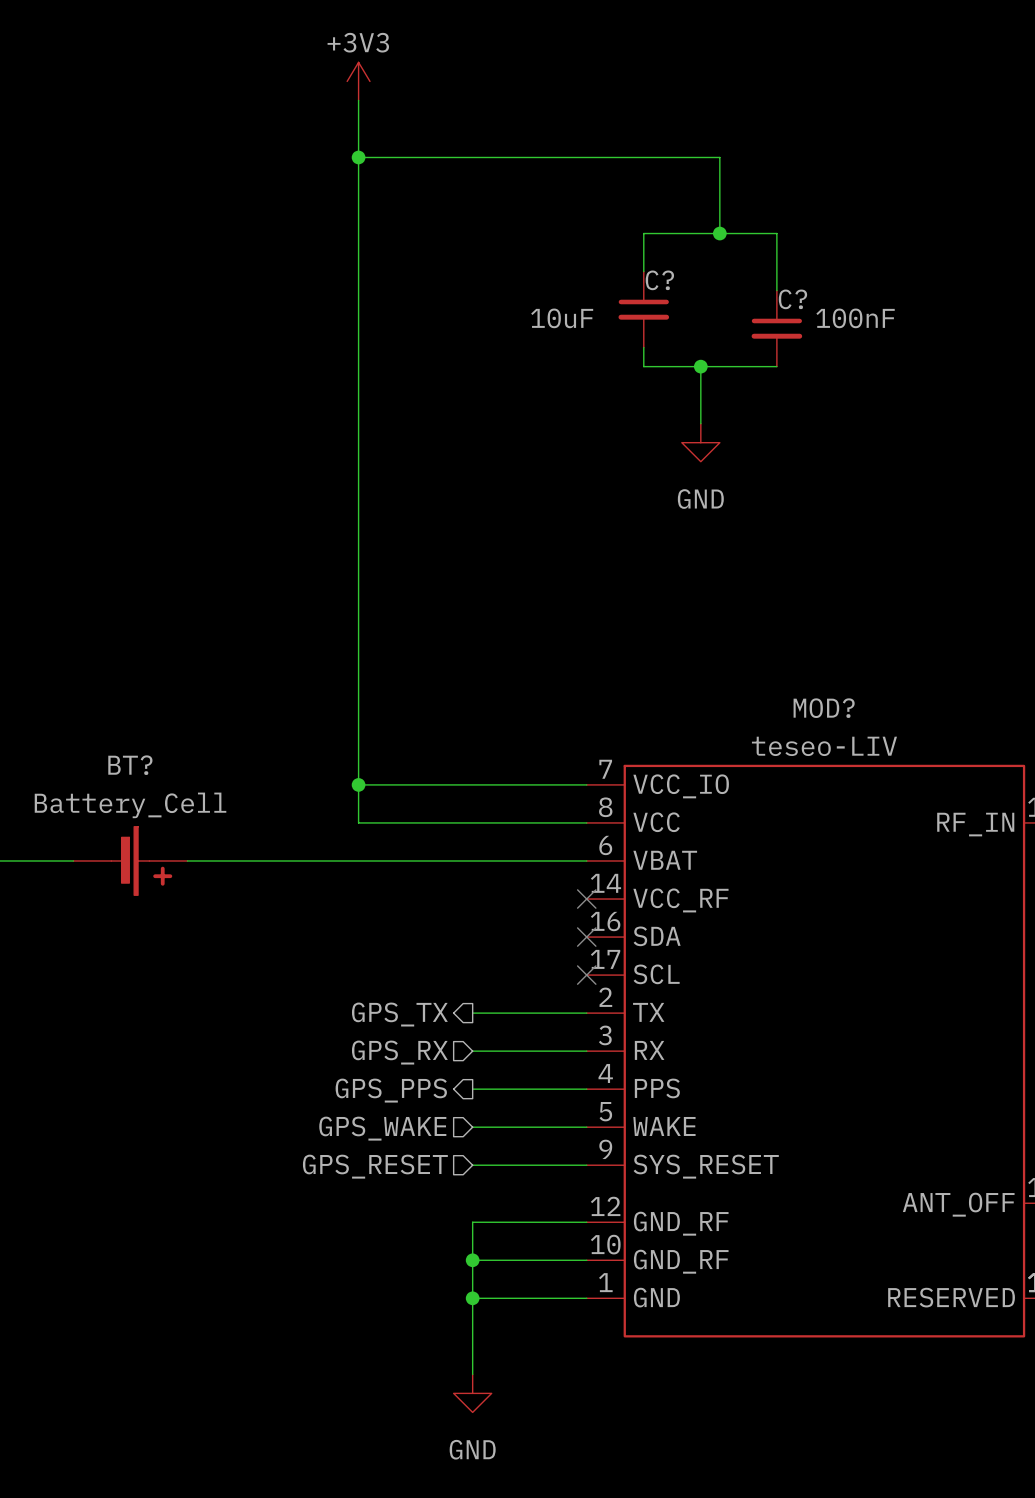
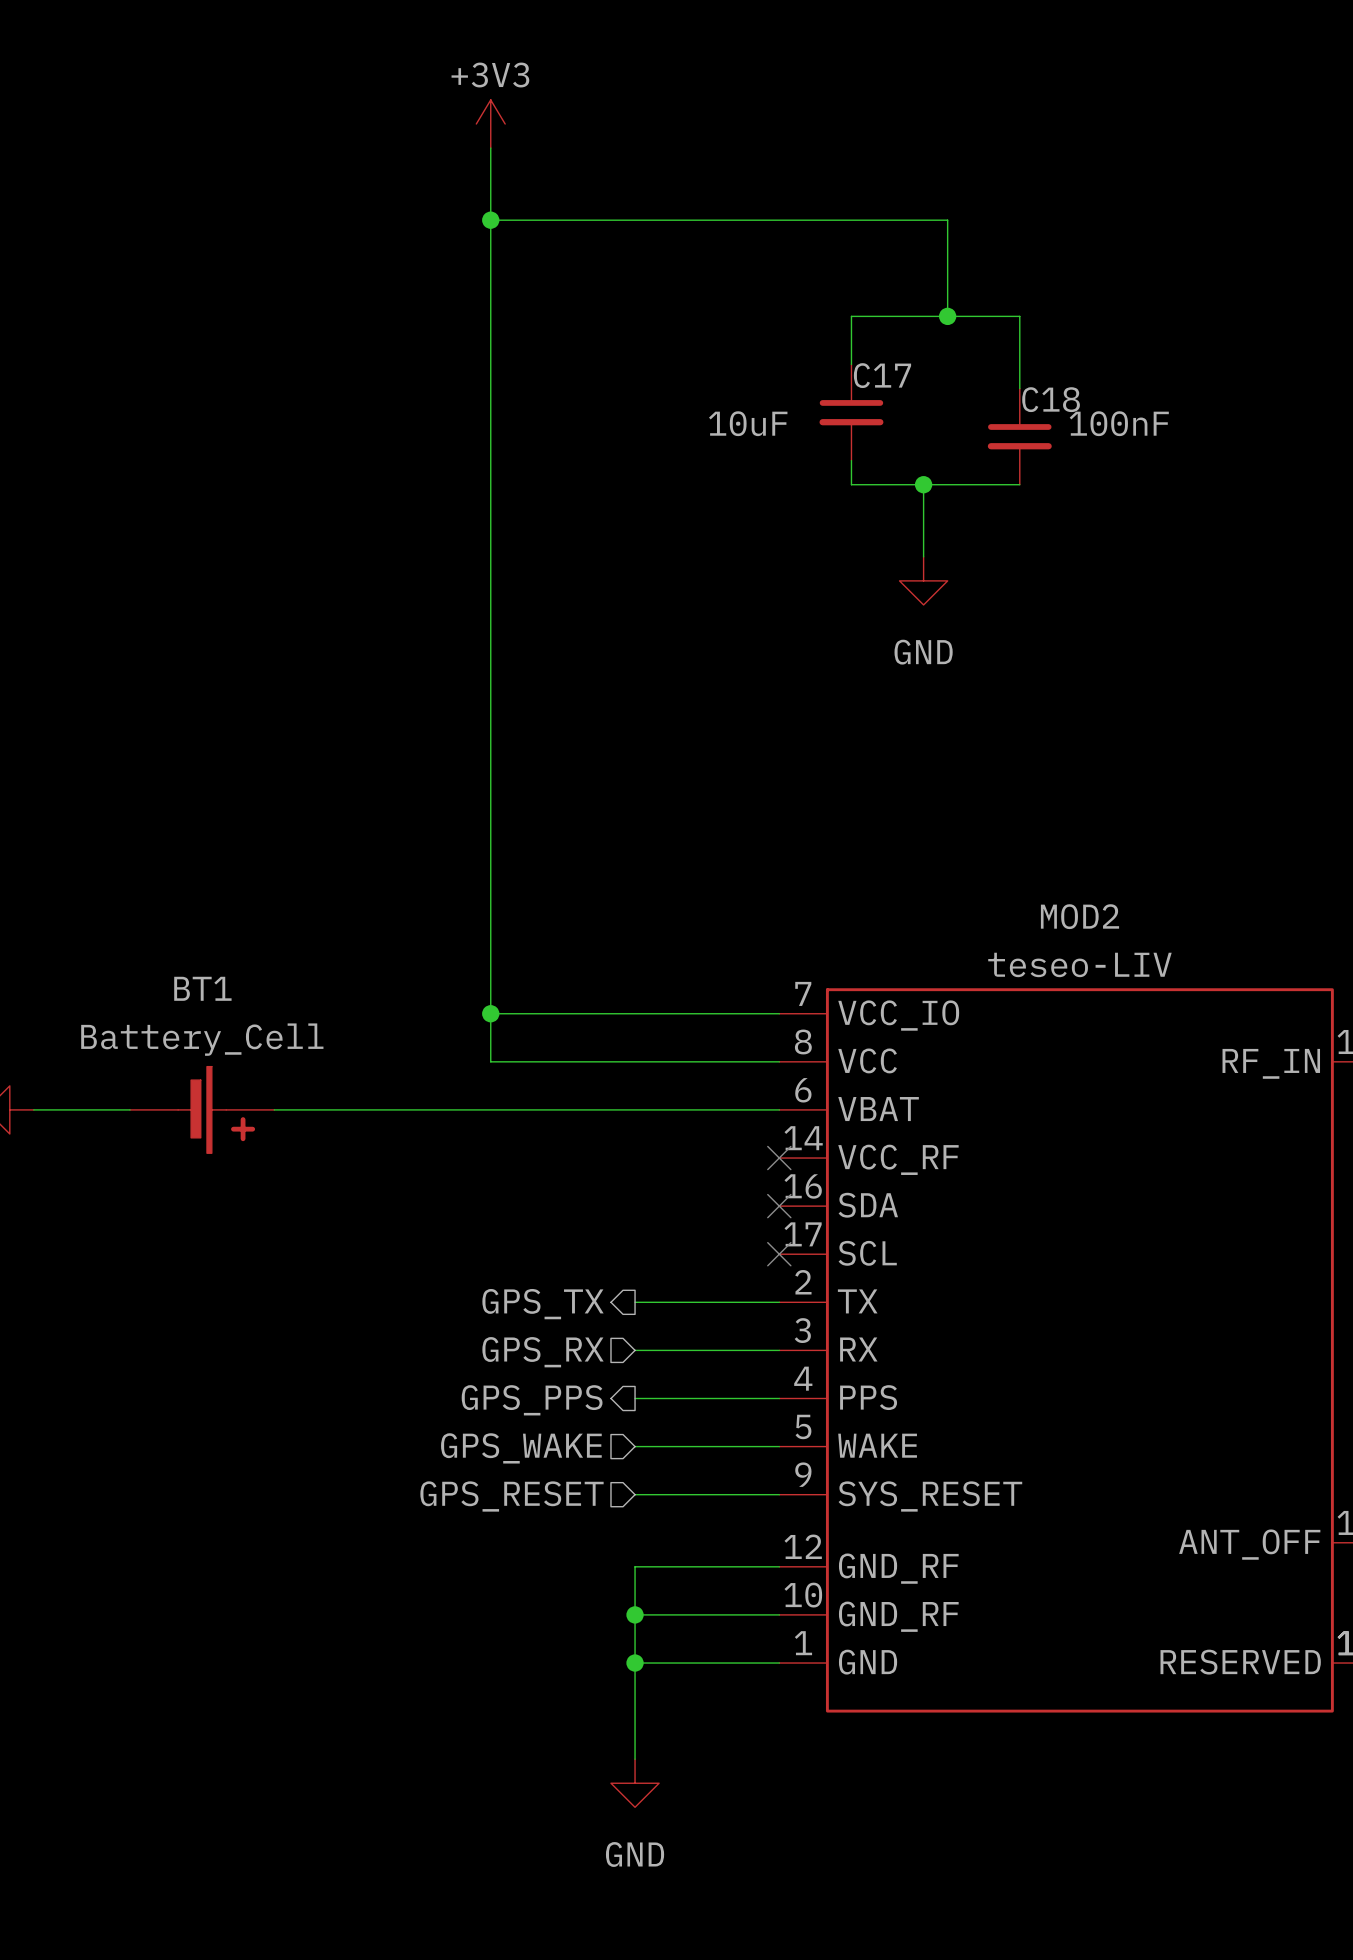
C? name: C? (659, 280) -> C17 (882, 375)
C? name: C? (792, 299) -> C18 (1051, 399)
MOD? name: MOD? (824, 708) -> MOD2 (1079, 916)
BT? name: BT? (130, 765) -> BT1 (202, 988)

